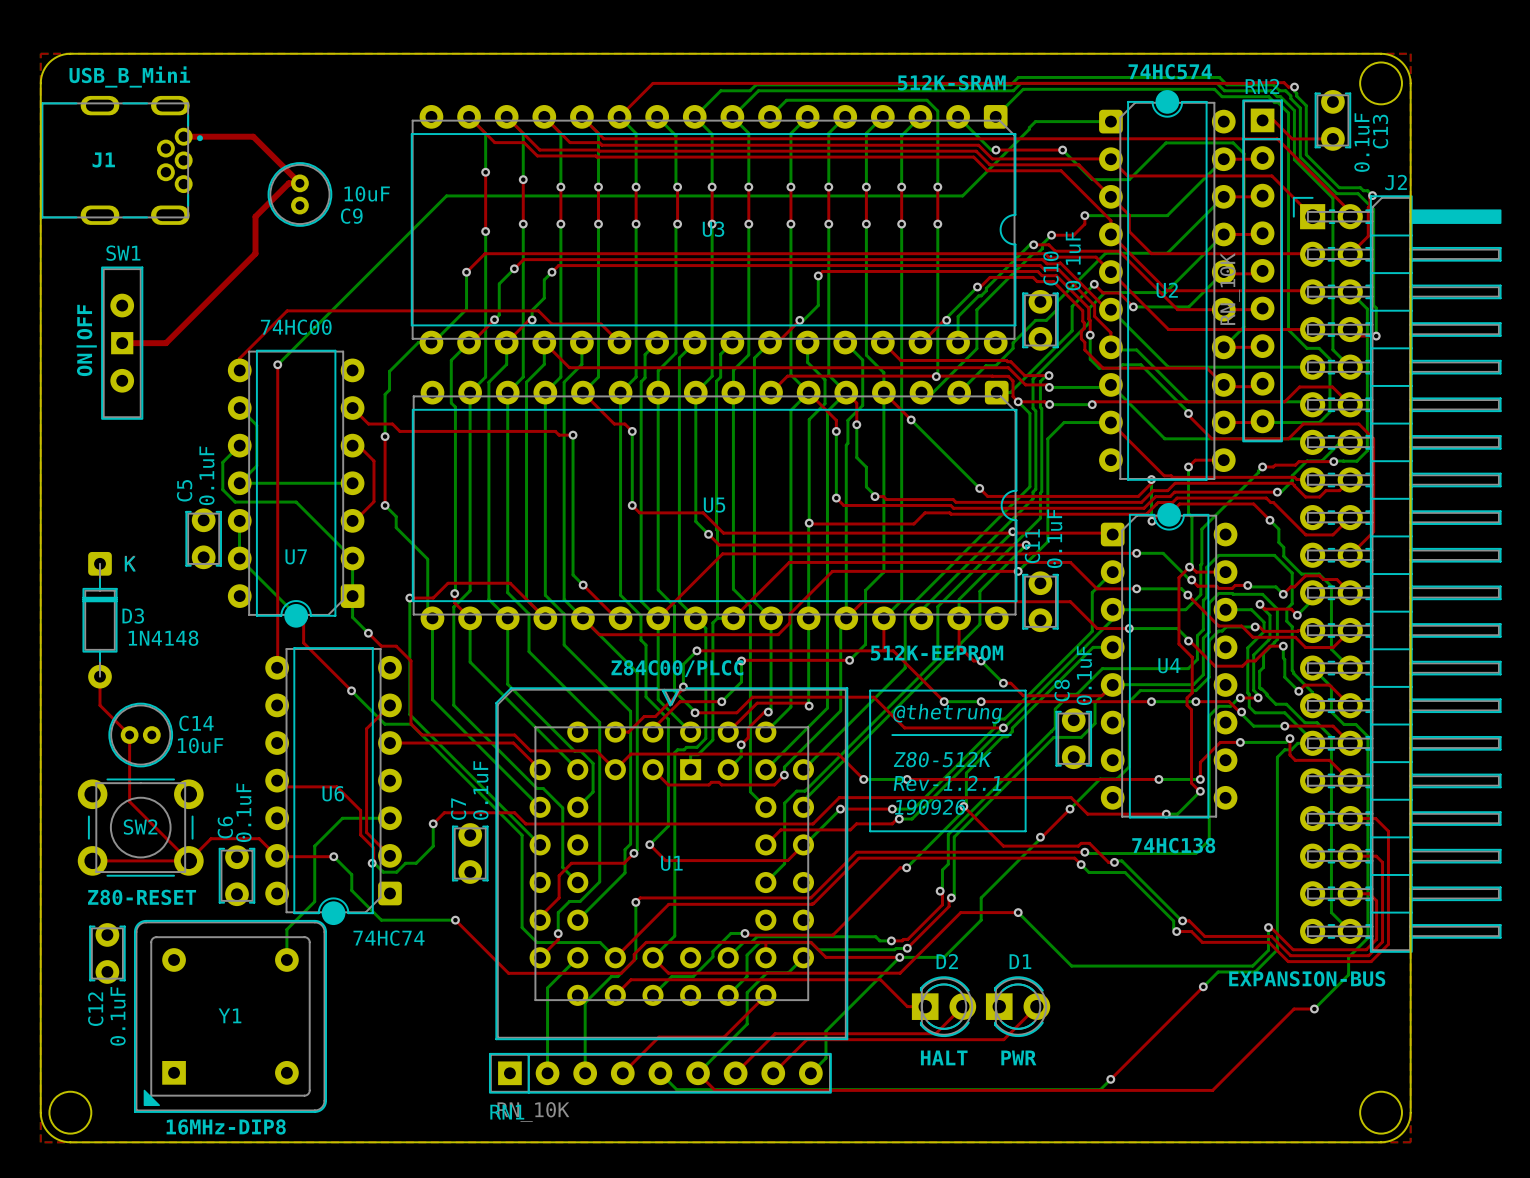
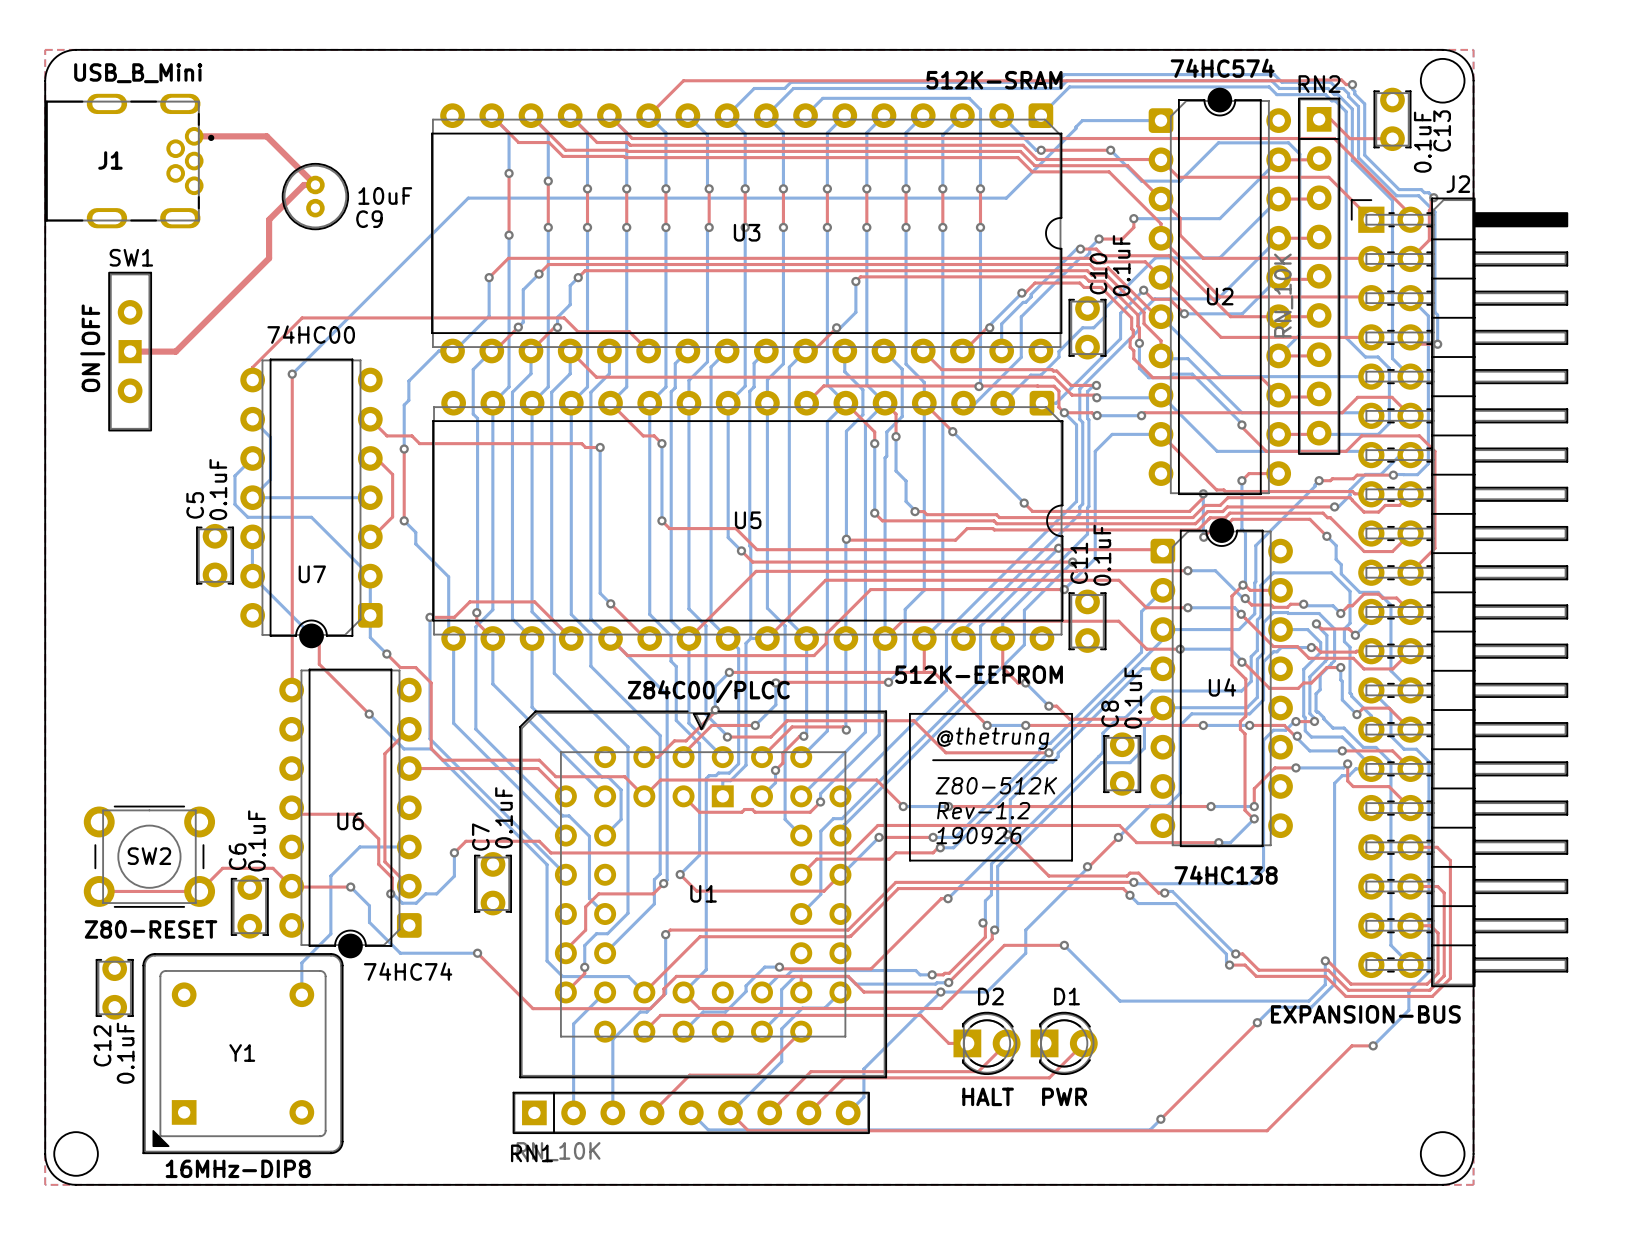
D3: 1N4148 (100, 620) -> none
top track: (100, 676) (100, 705) (129, 735) (129, 801) (188, 860) -> none
C14: 10uF (140, 735) -> none
text: Rev-1.2.1 (947, 783) -> Rev-1.2 (983, 810)

